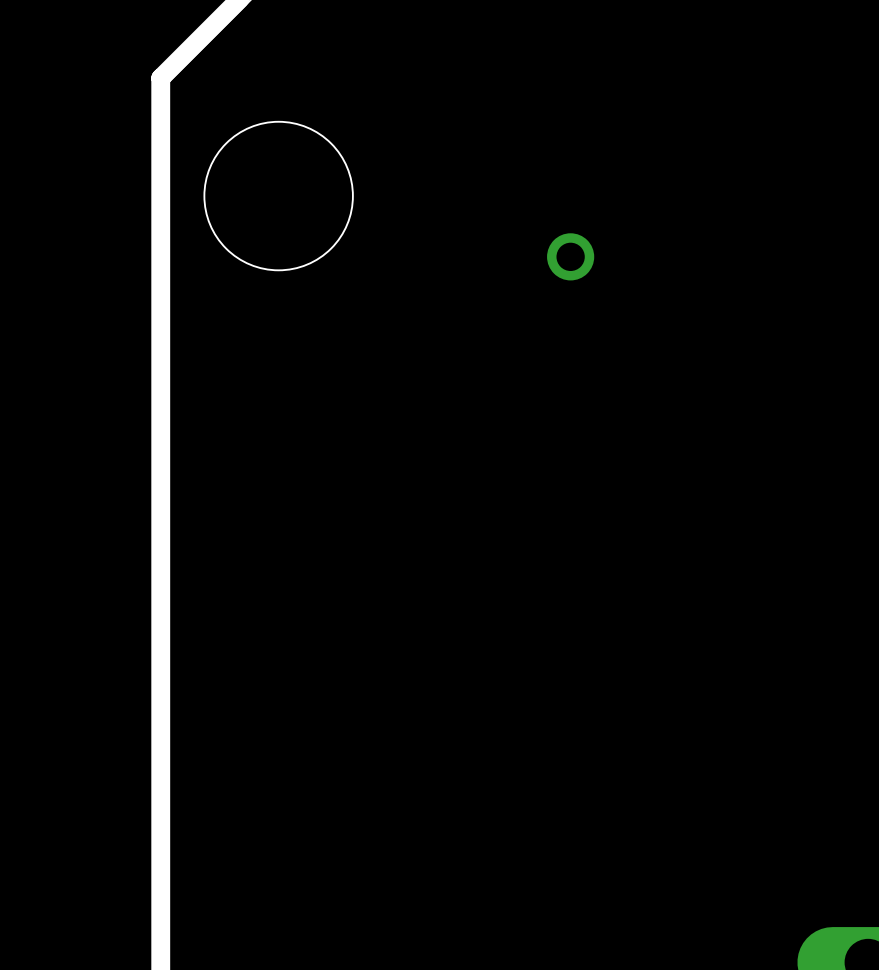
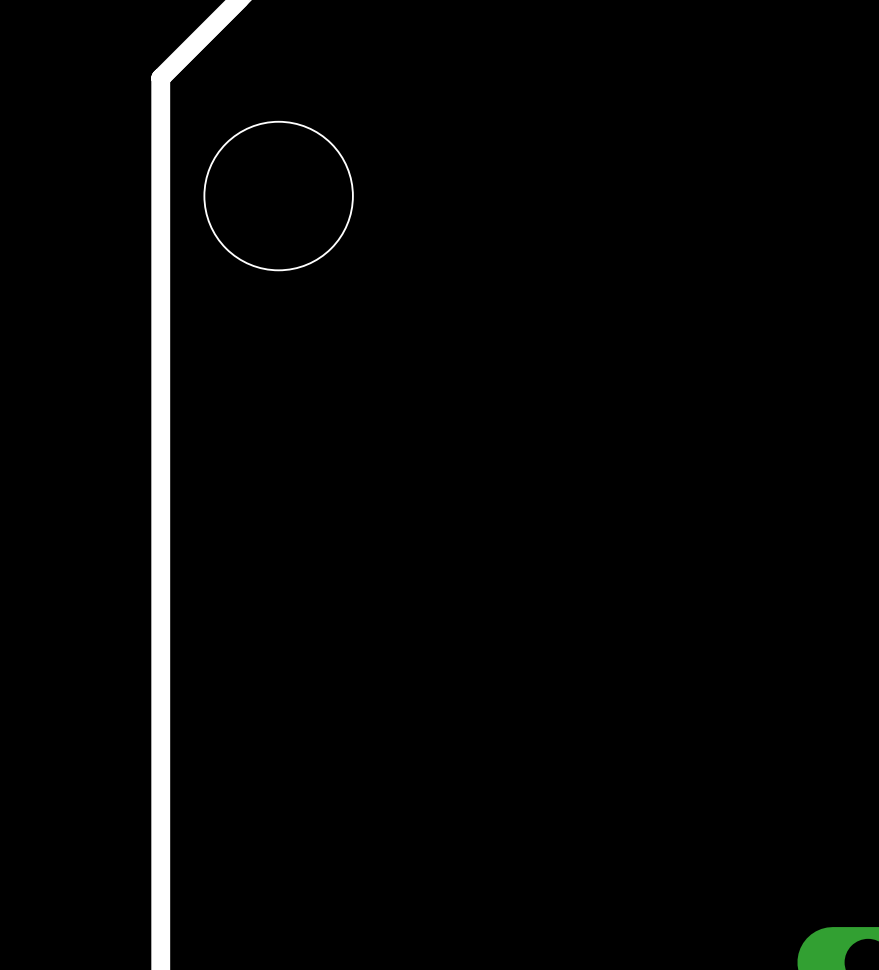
via: (570, 256) -> none

